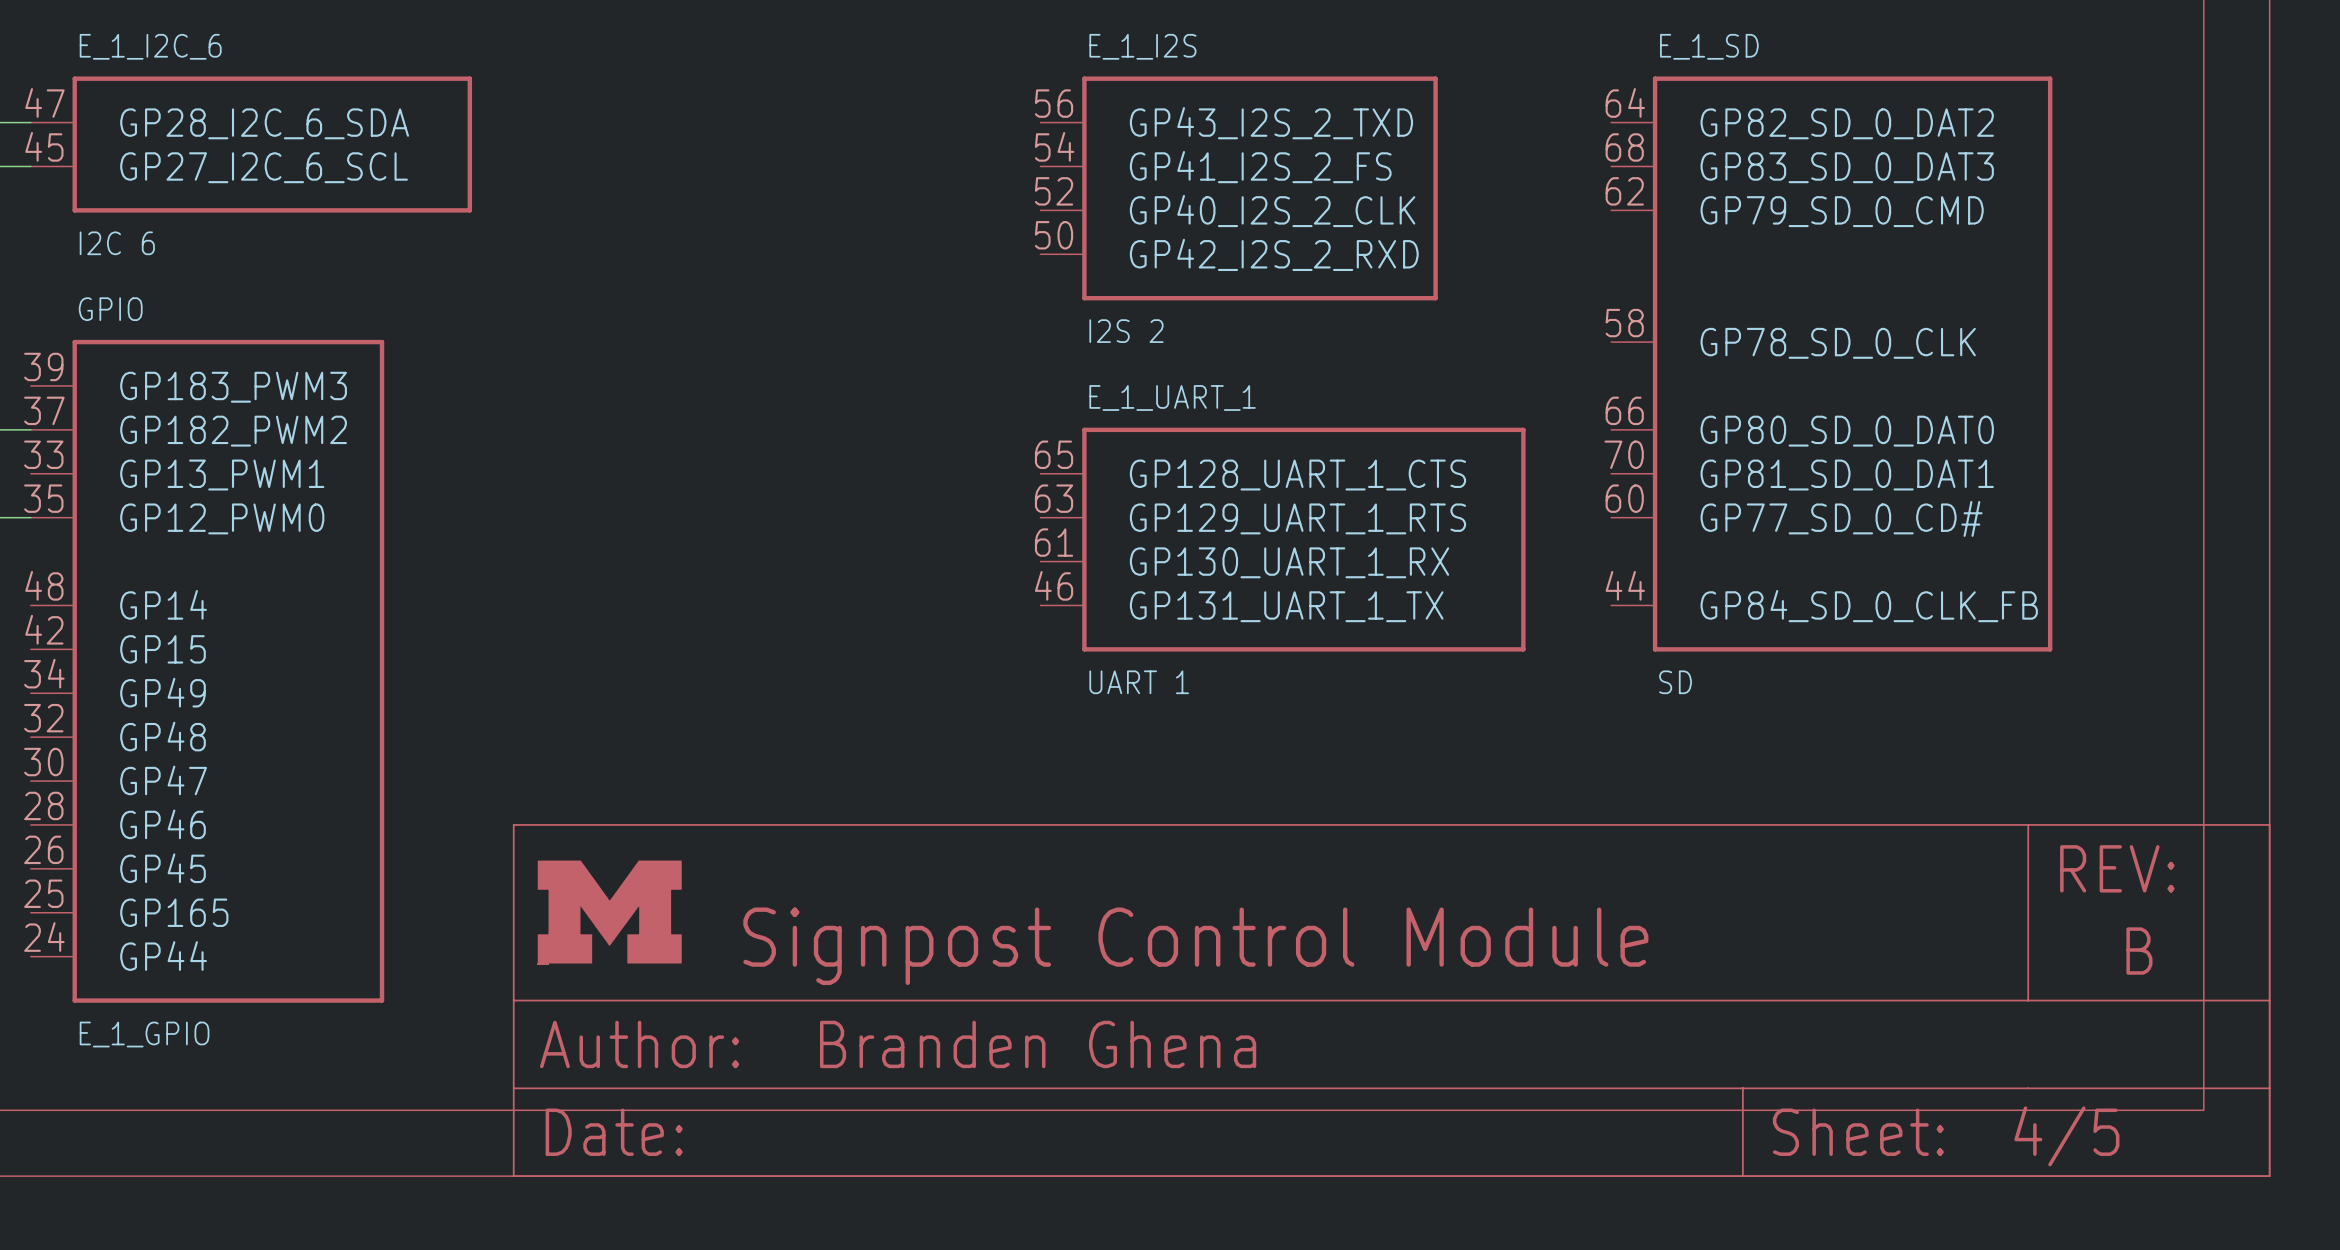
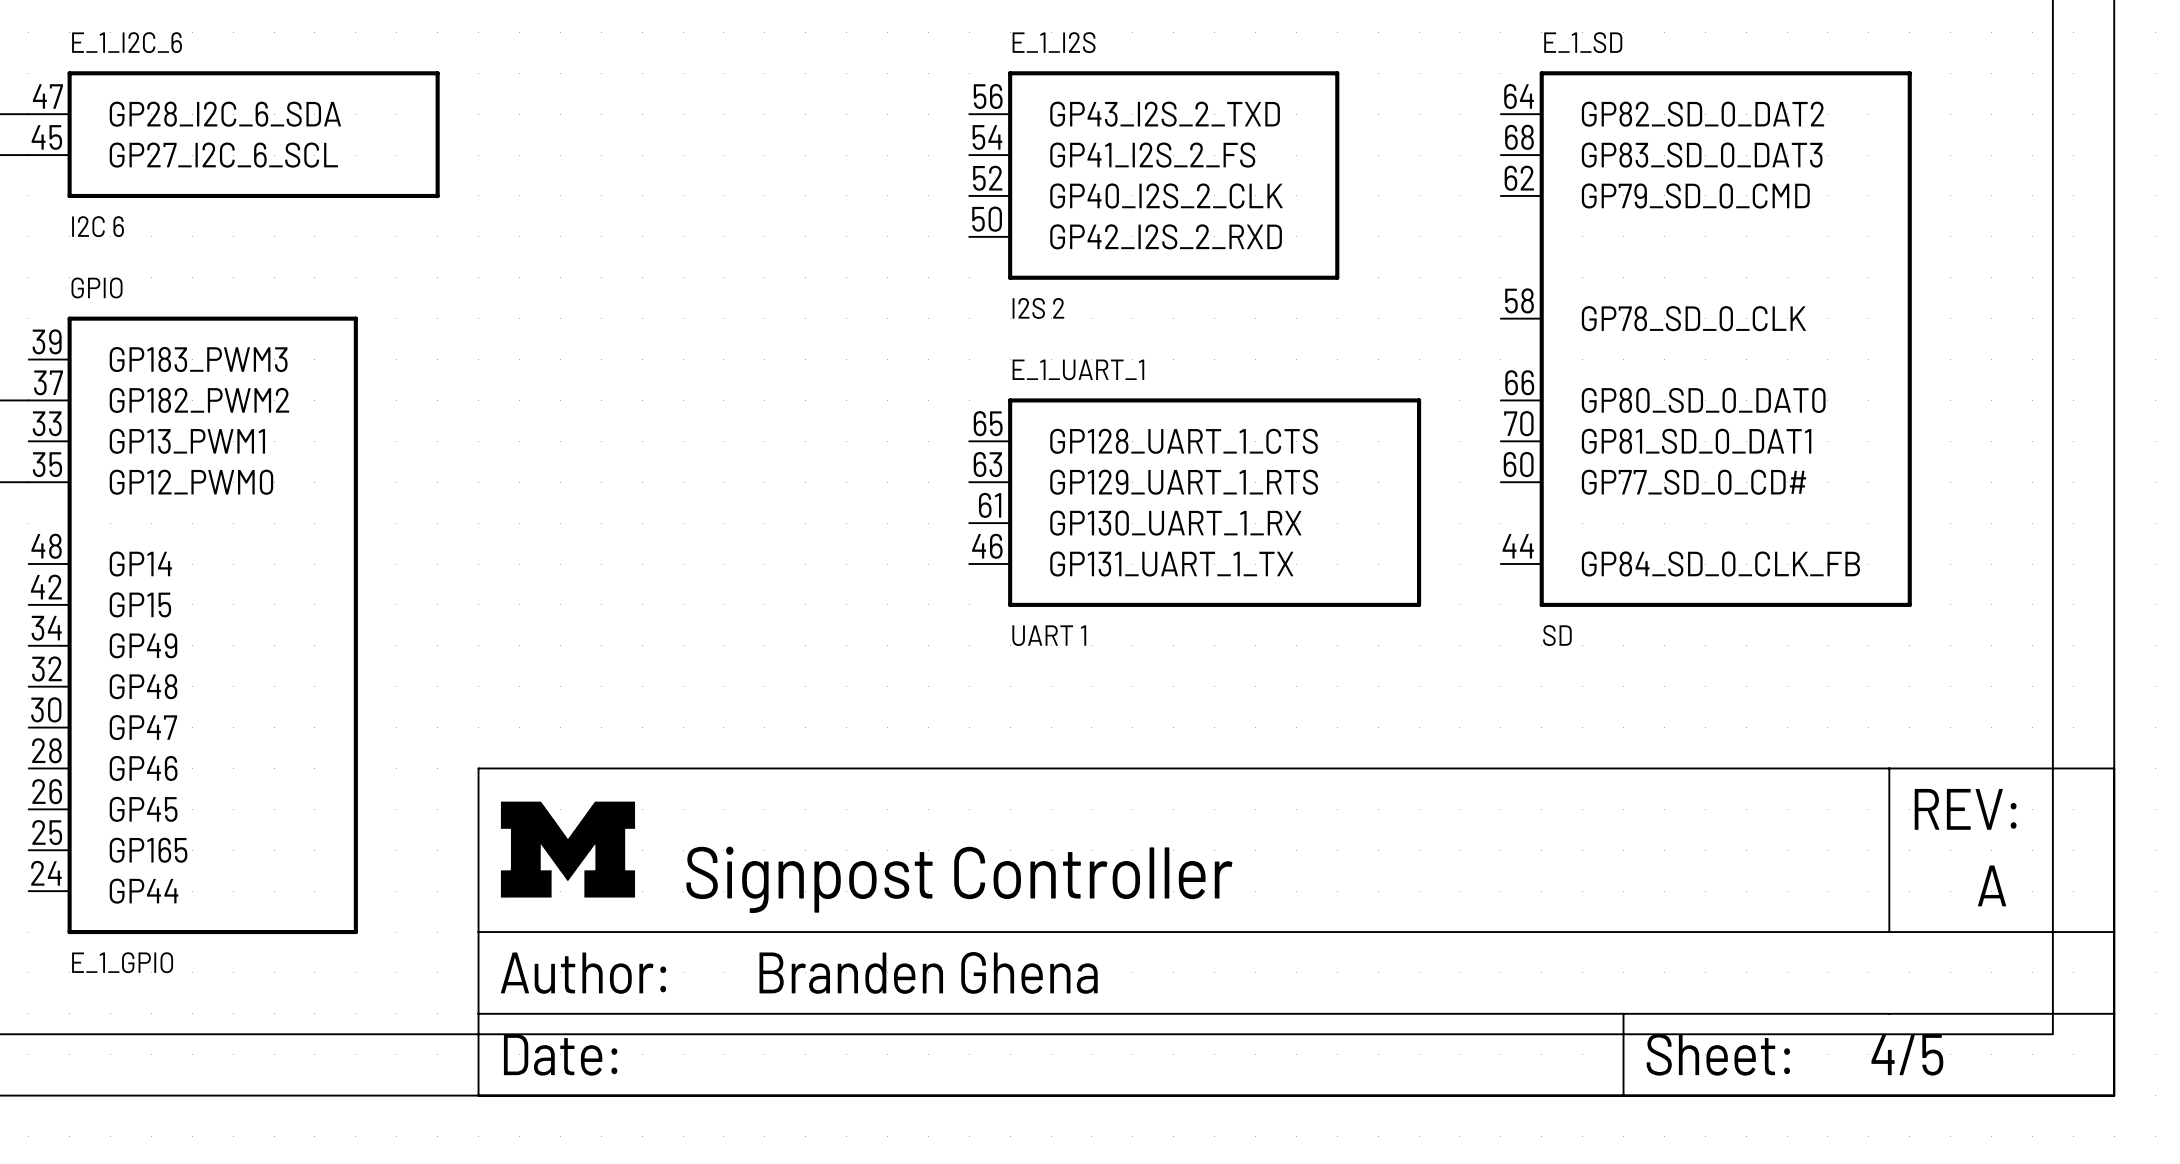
part text: Signpost Control Module (1195, 946) -> Signpost Controller (959, 879)
part text: B (2139, 951) -> A (1992, 885)

